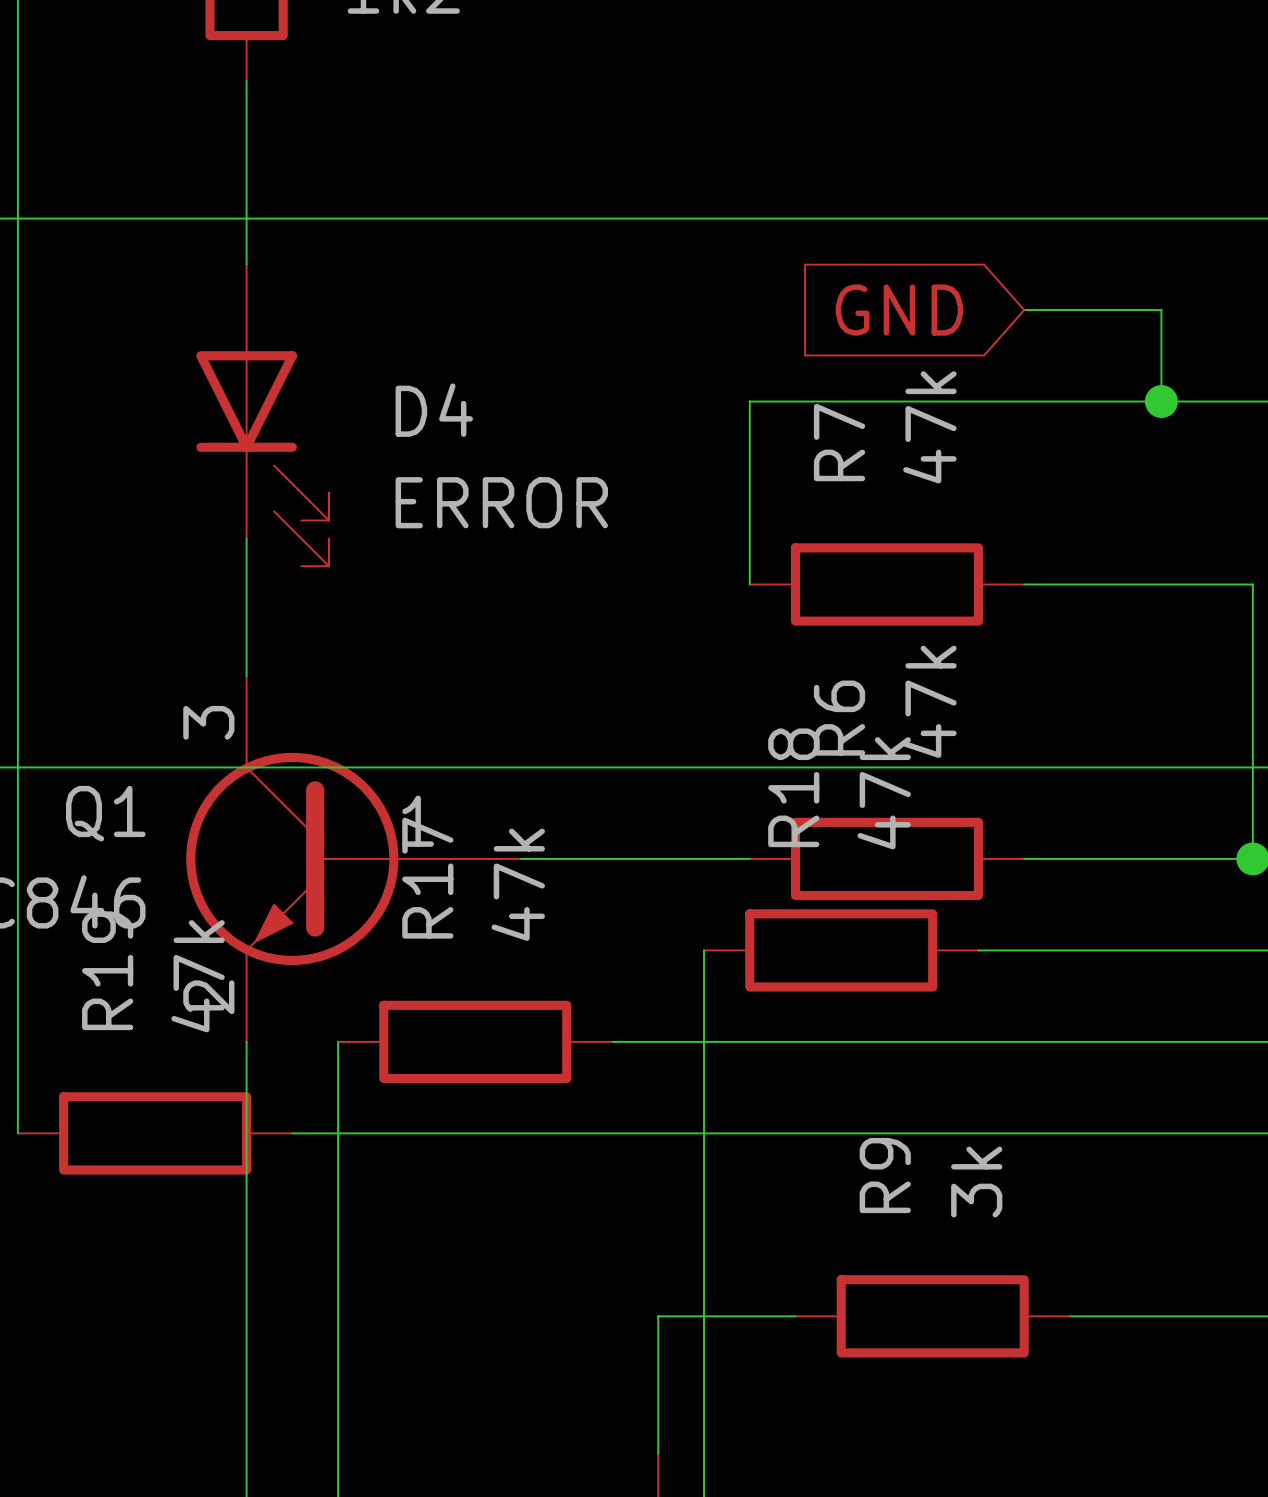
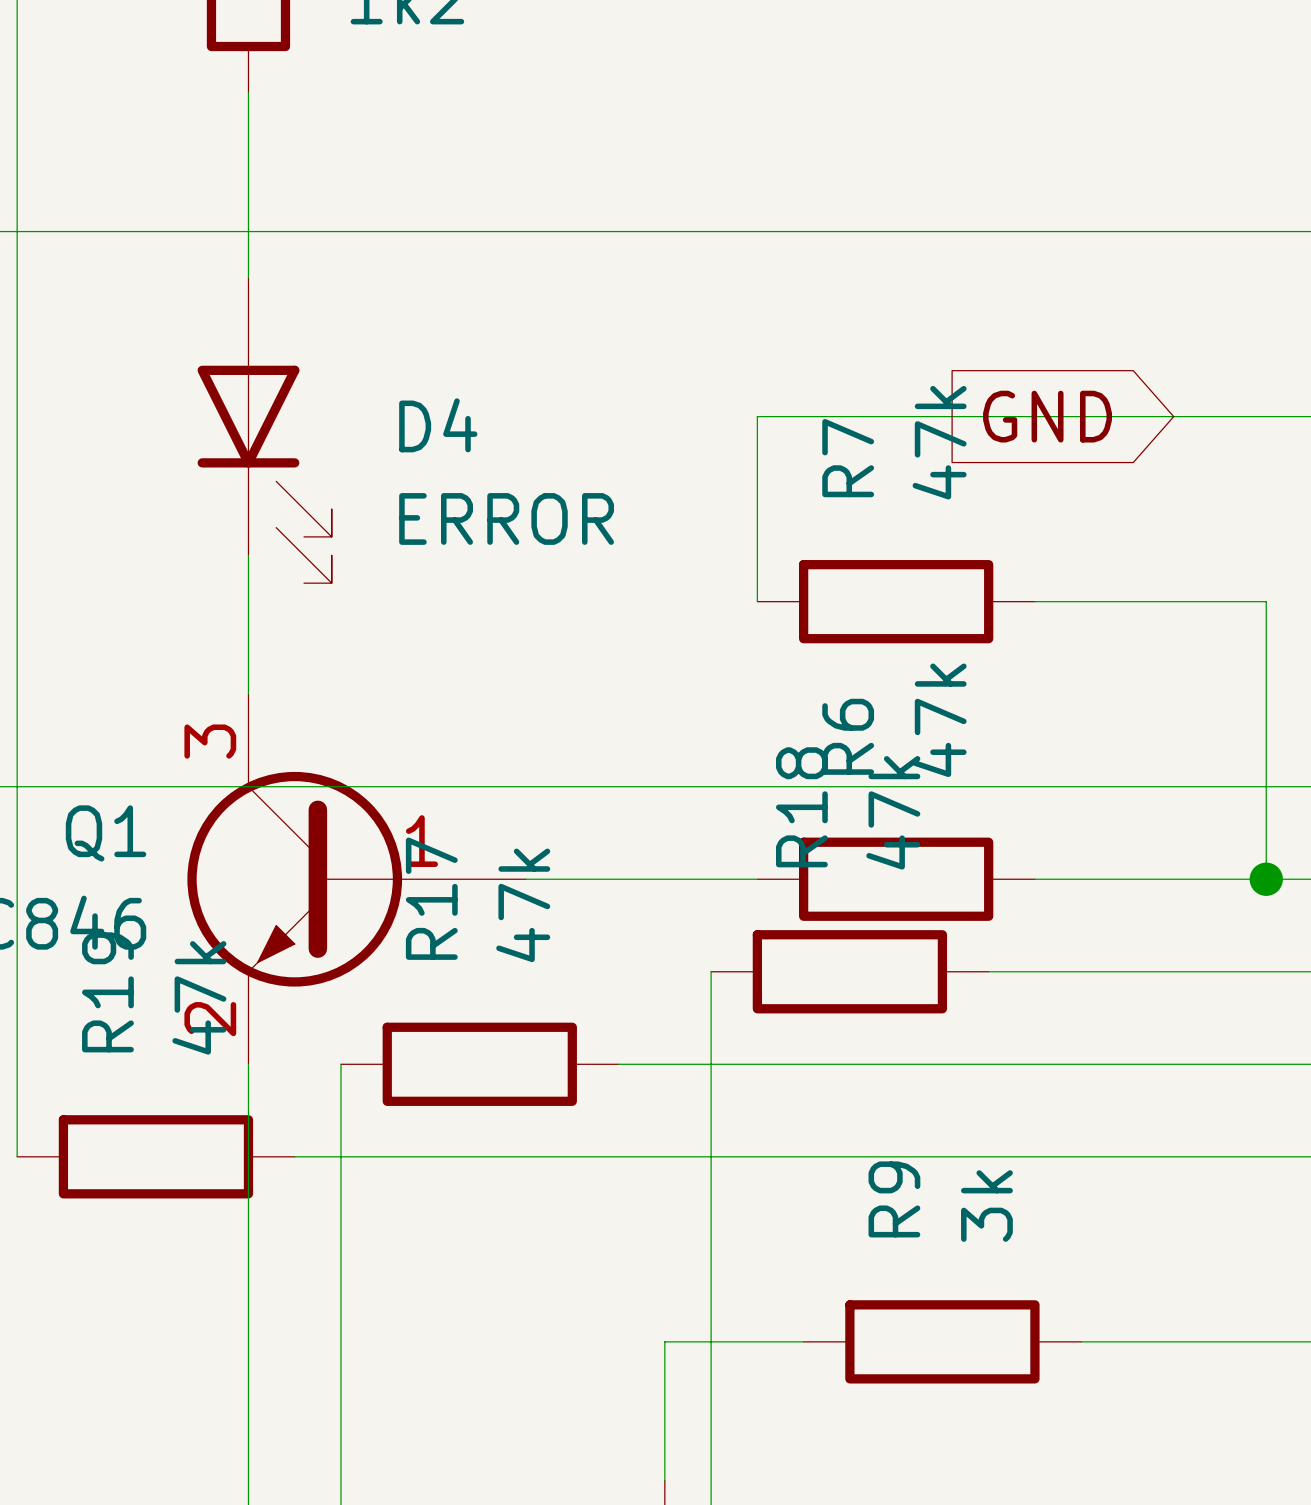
global label position: GND (899, 310) -> GND (1047, 416)
wire: (1024, 310) (1161, 310) (1161, 401) -> none
junction: (1161, 401) -> none

